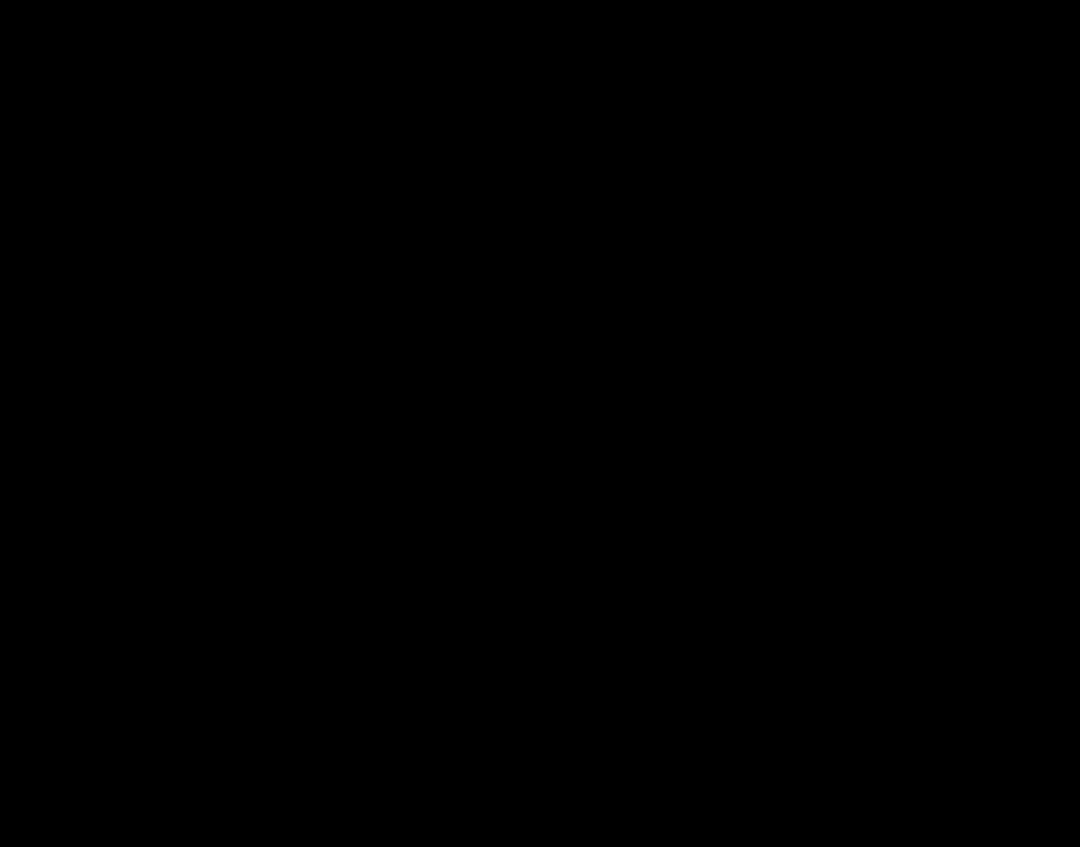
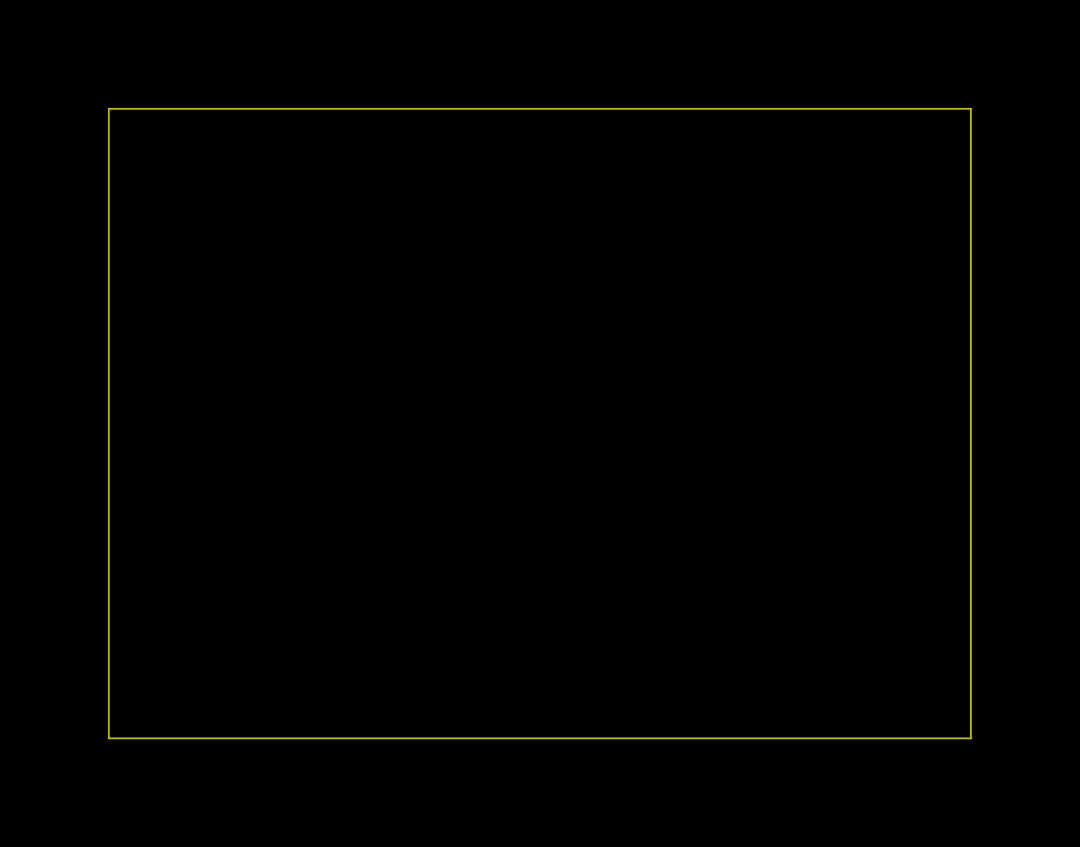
board edge: none -> (970, 108) (108, 108) (108, 738) (970, 738) (970, 108)

